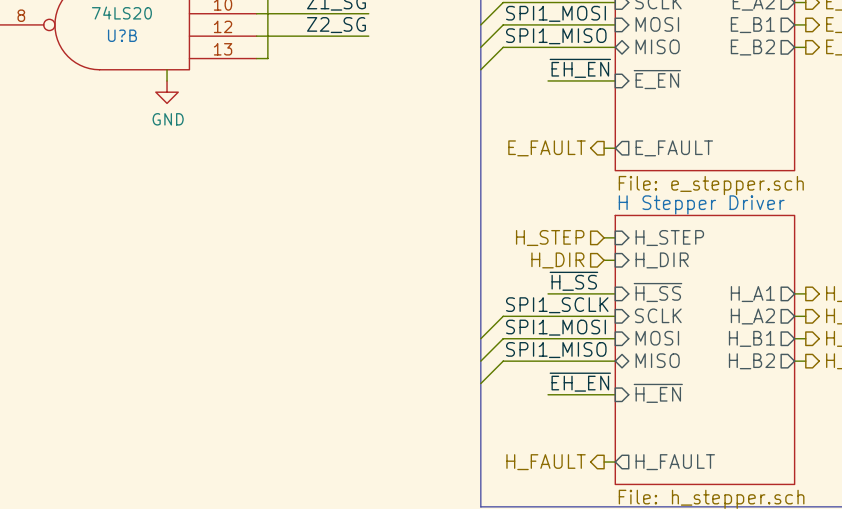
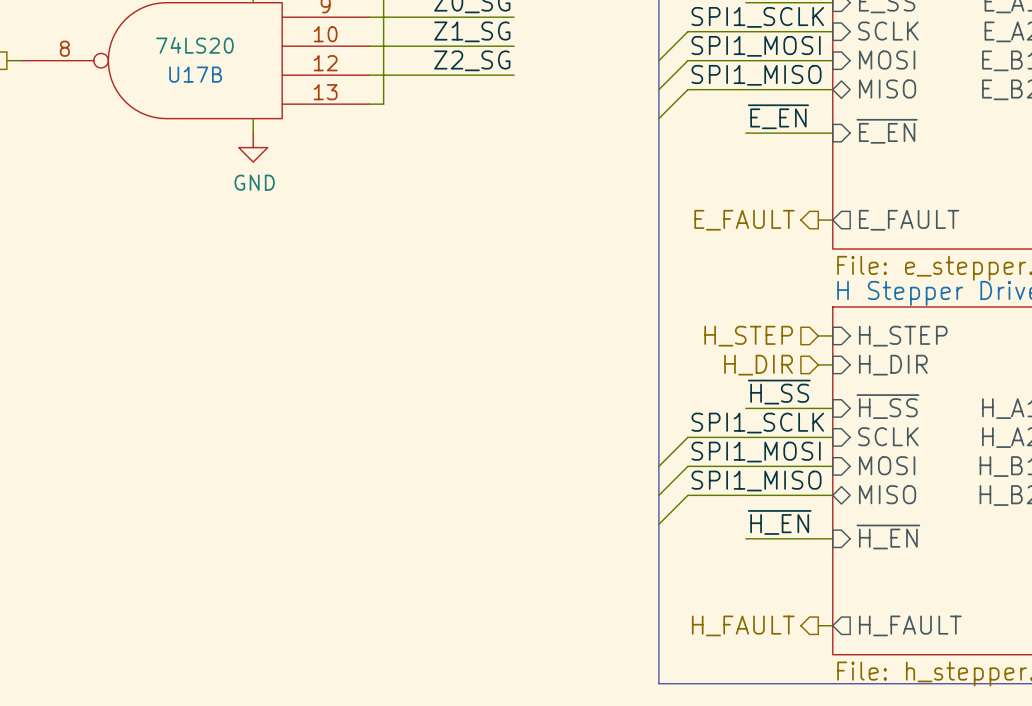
U?B name: U?B (122, 35) -> U17B (195, 74)
label: ~{EH_EN} (580, 68) -> ~{E_EN} (778, 116)
label: ~{EH_EN} (580, 382) -> ~{H_EN} (779, 522)

